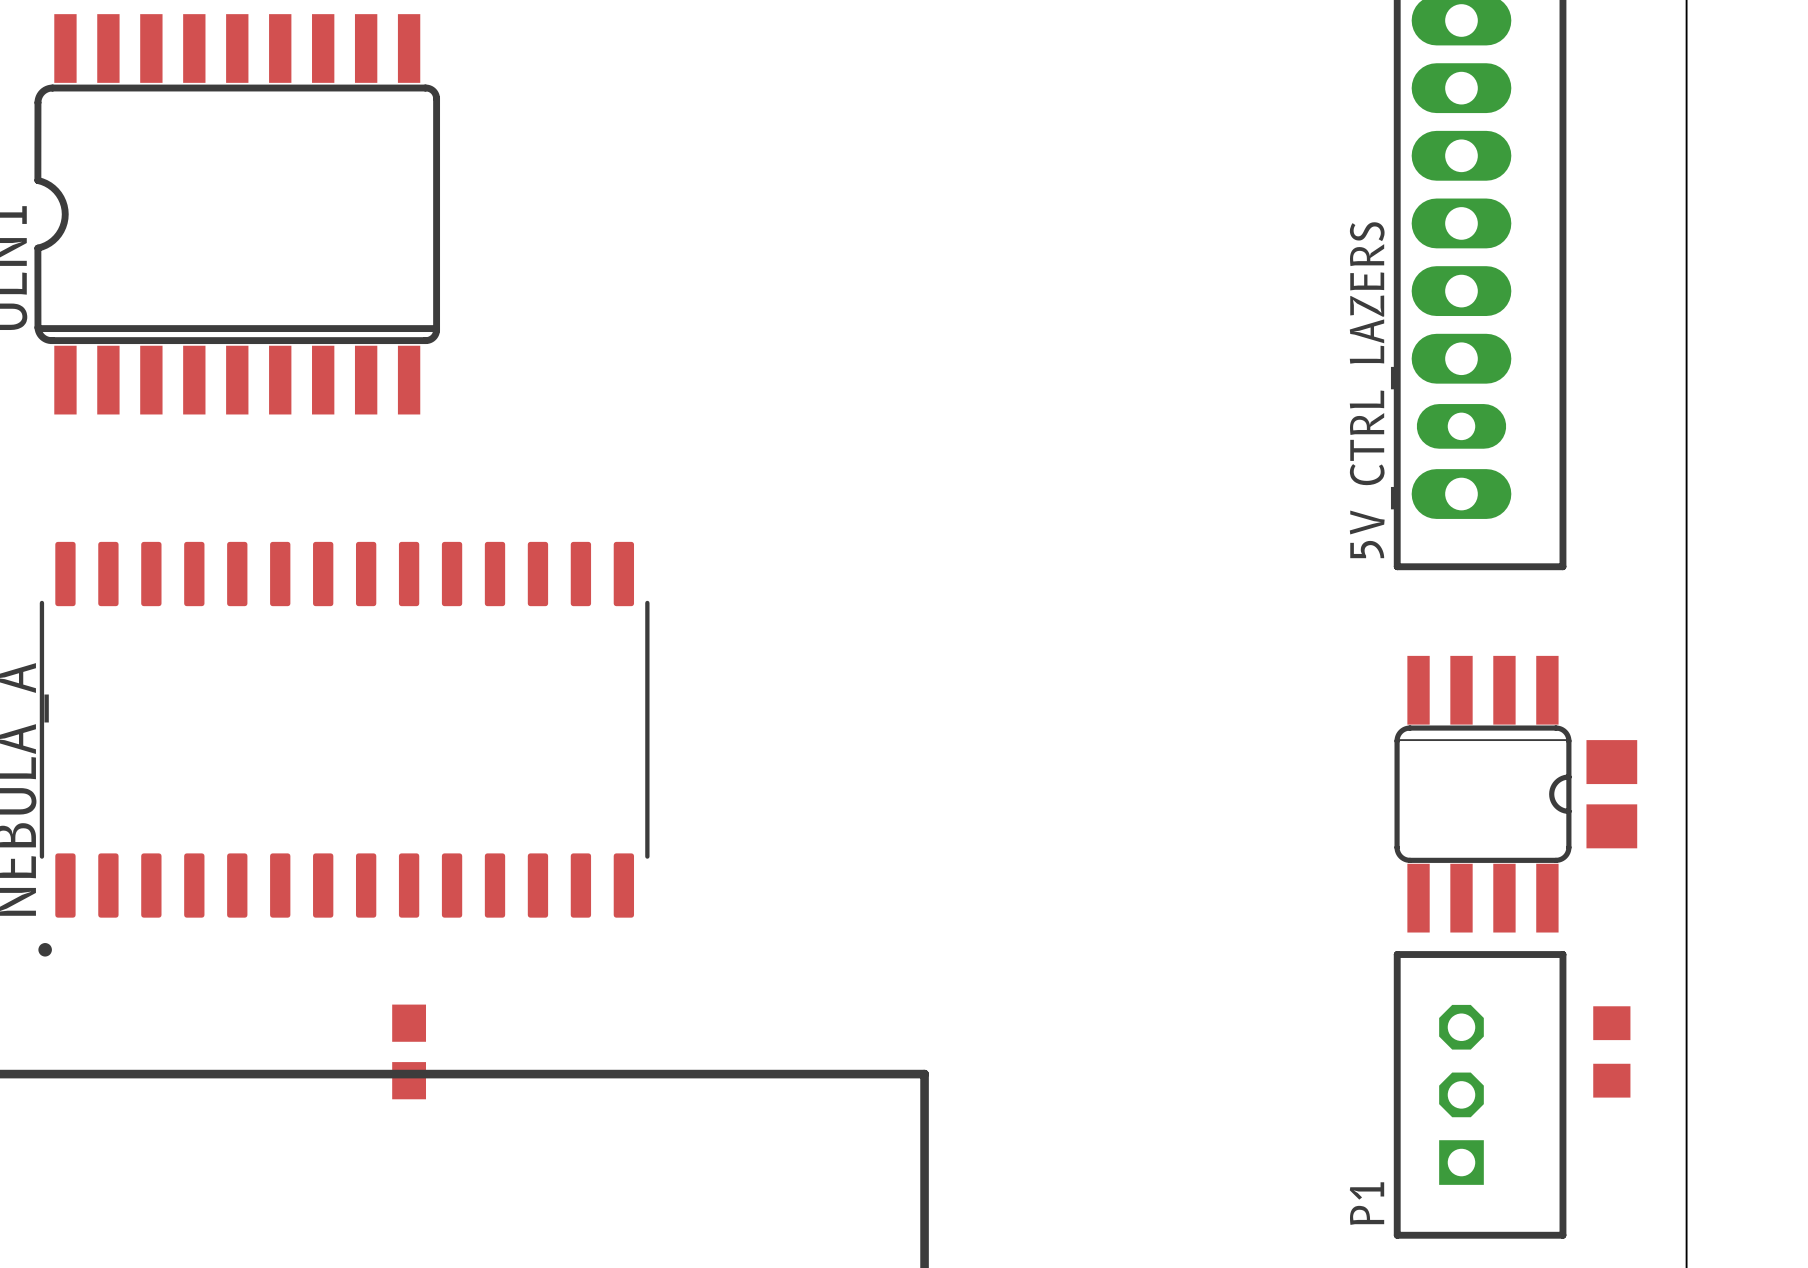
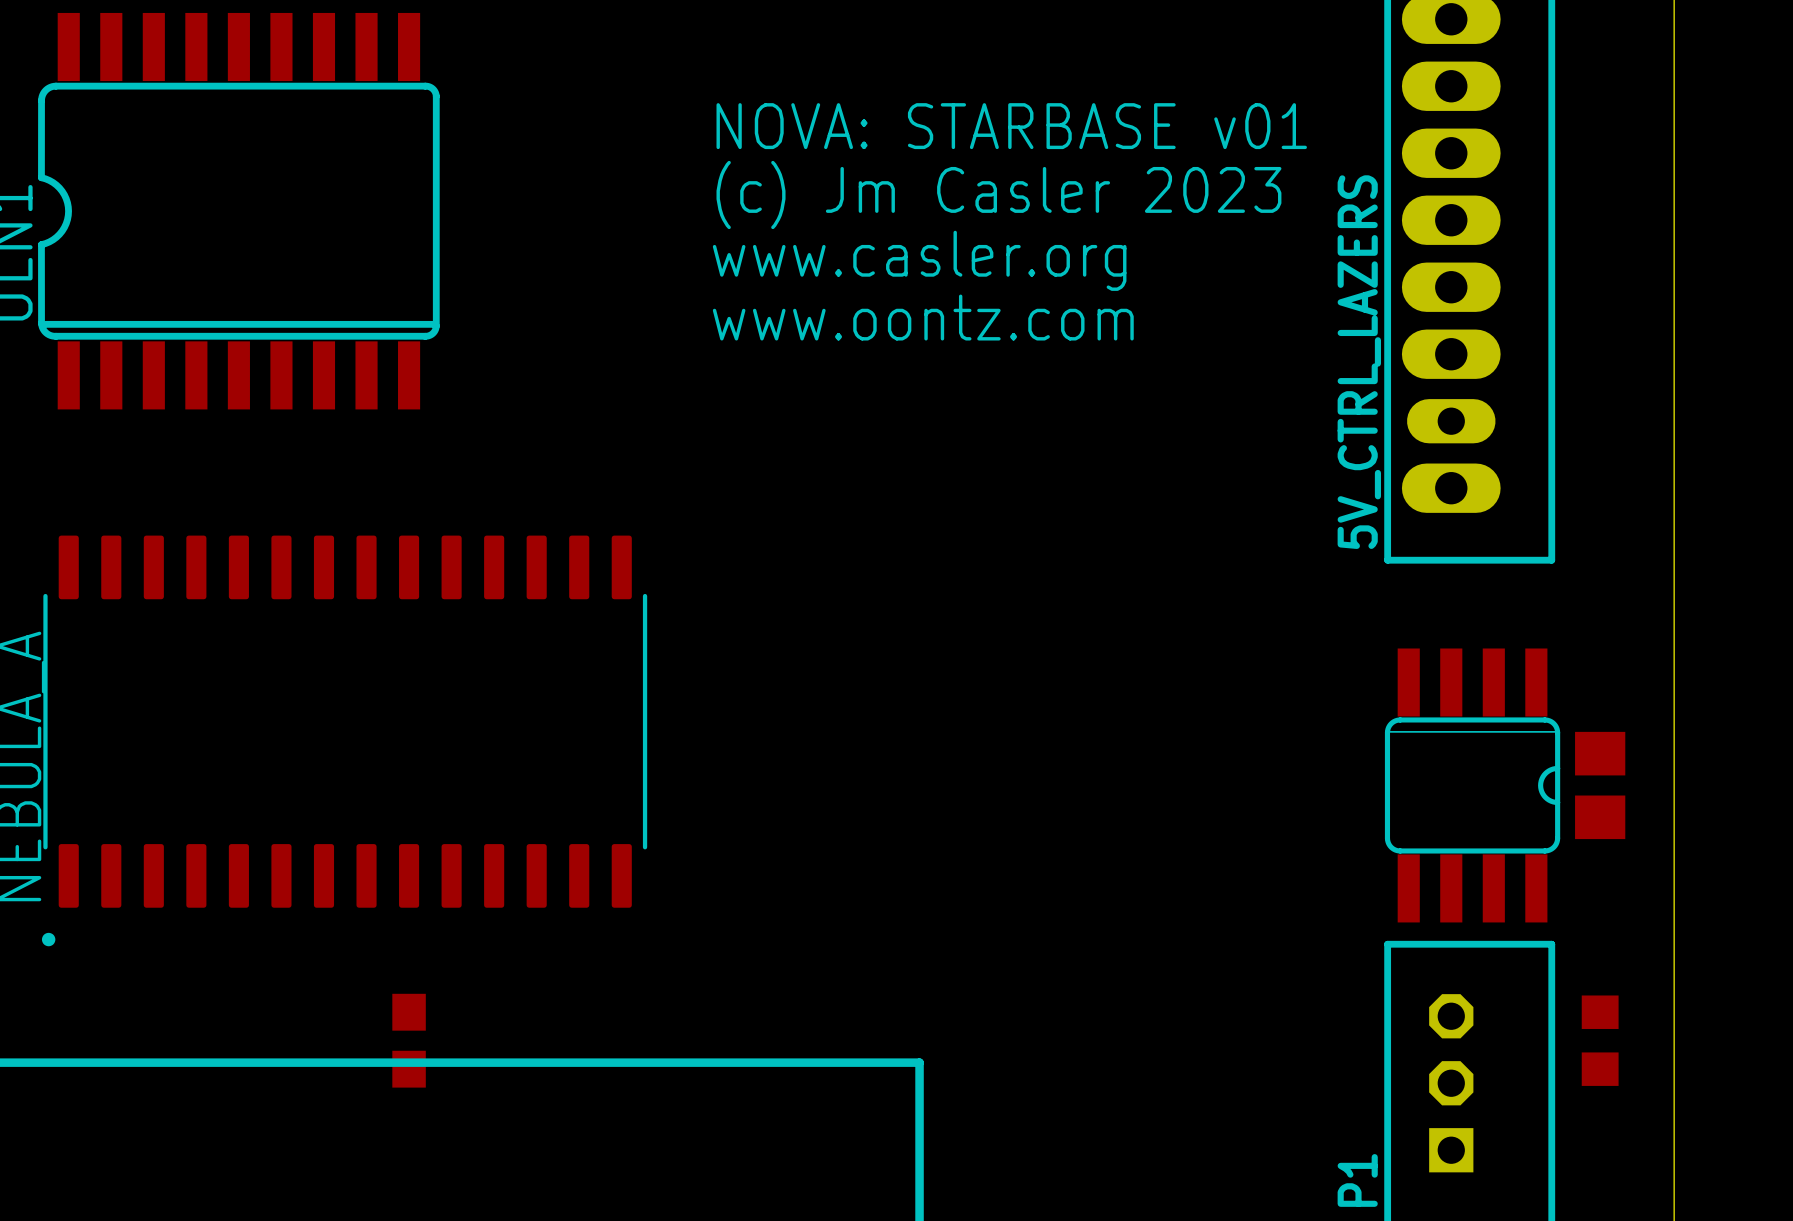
text: none -> NOVA: STARBASE v01 (1011, 126)
text: none -> (c) Jm Casler 2023 (998, 194)
text: none -> www.casler.org (919, 260)
text: none -> www.oontz.com (923, 317)

